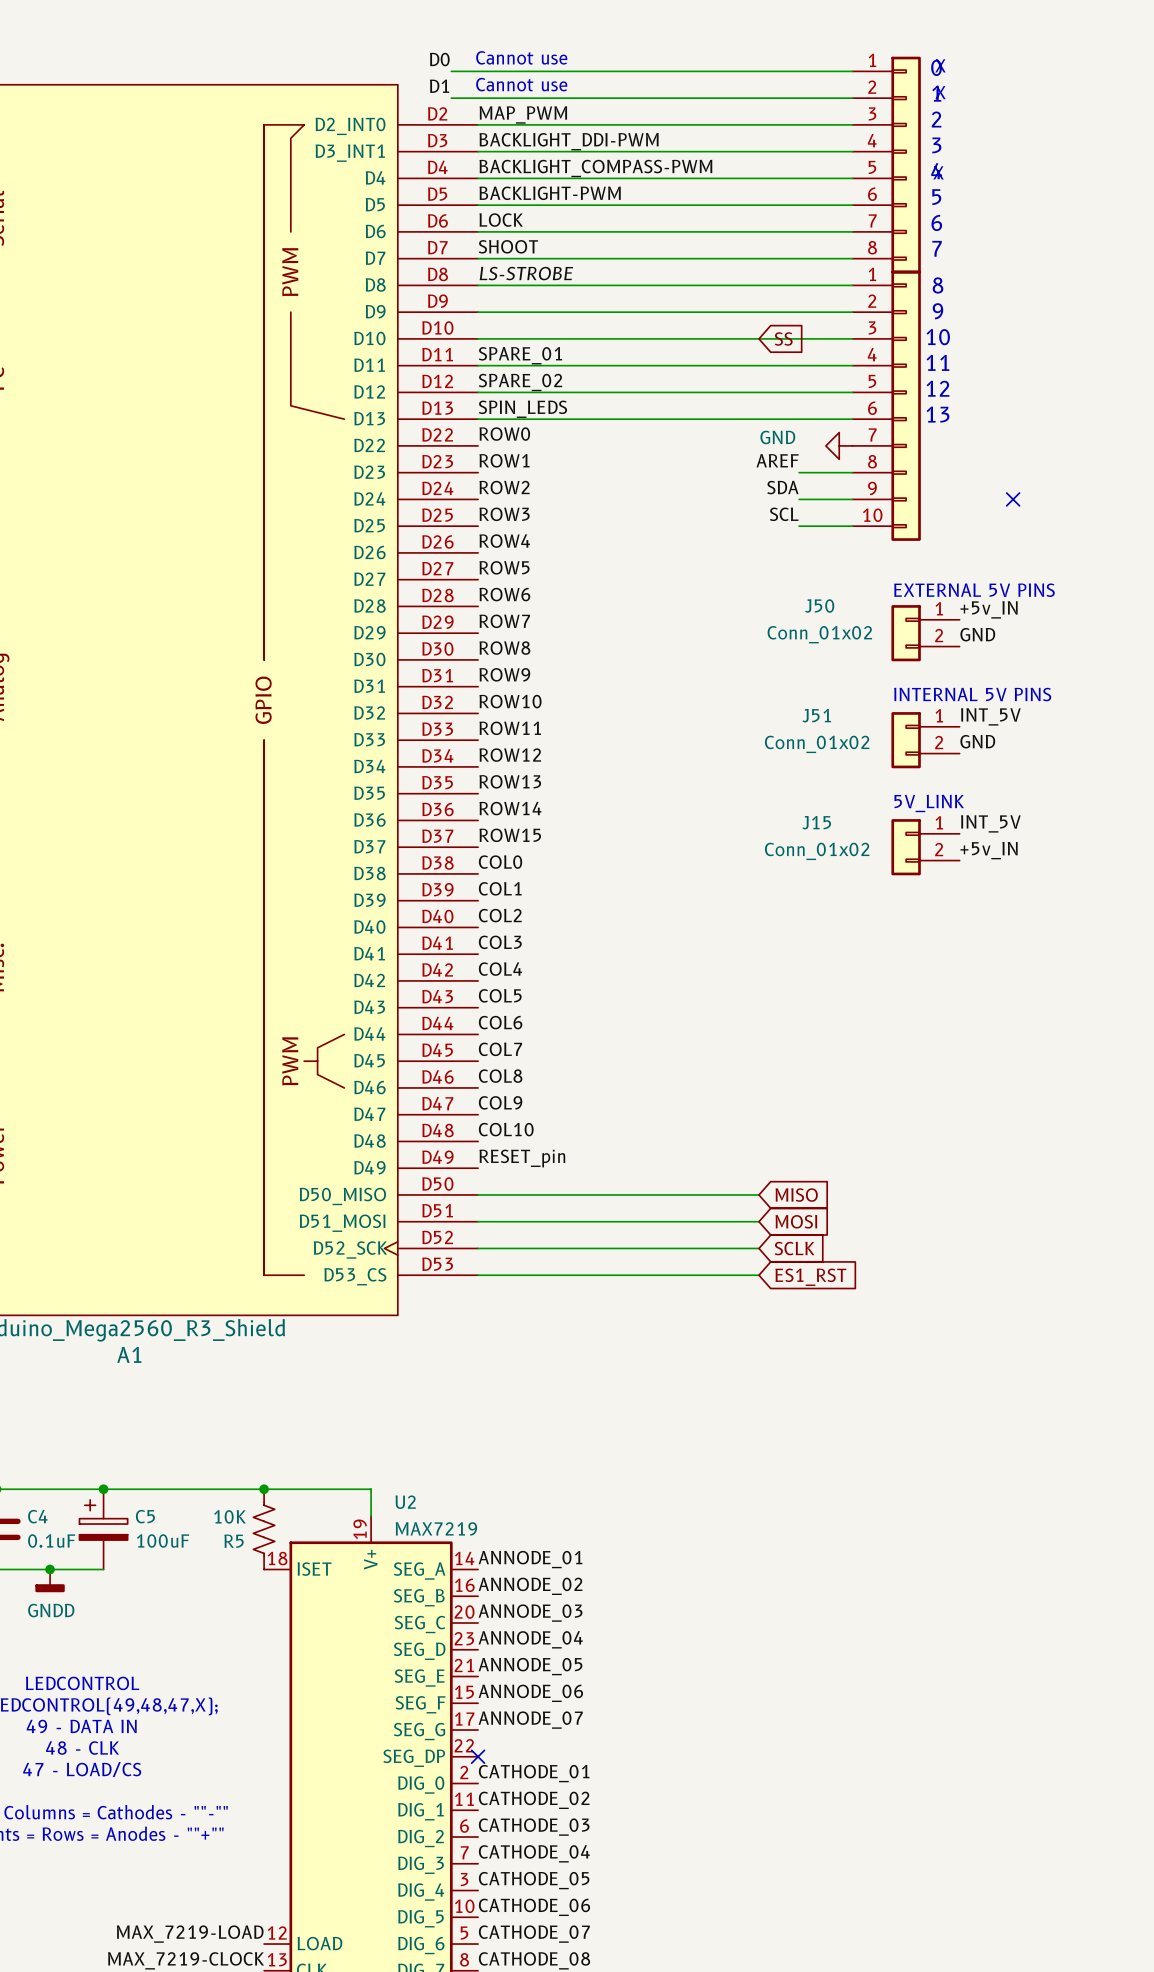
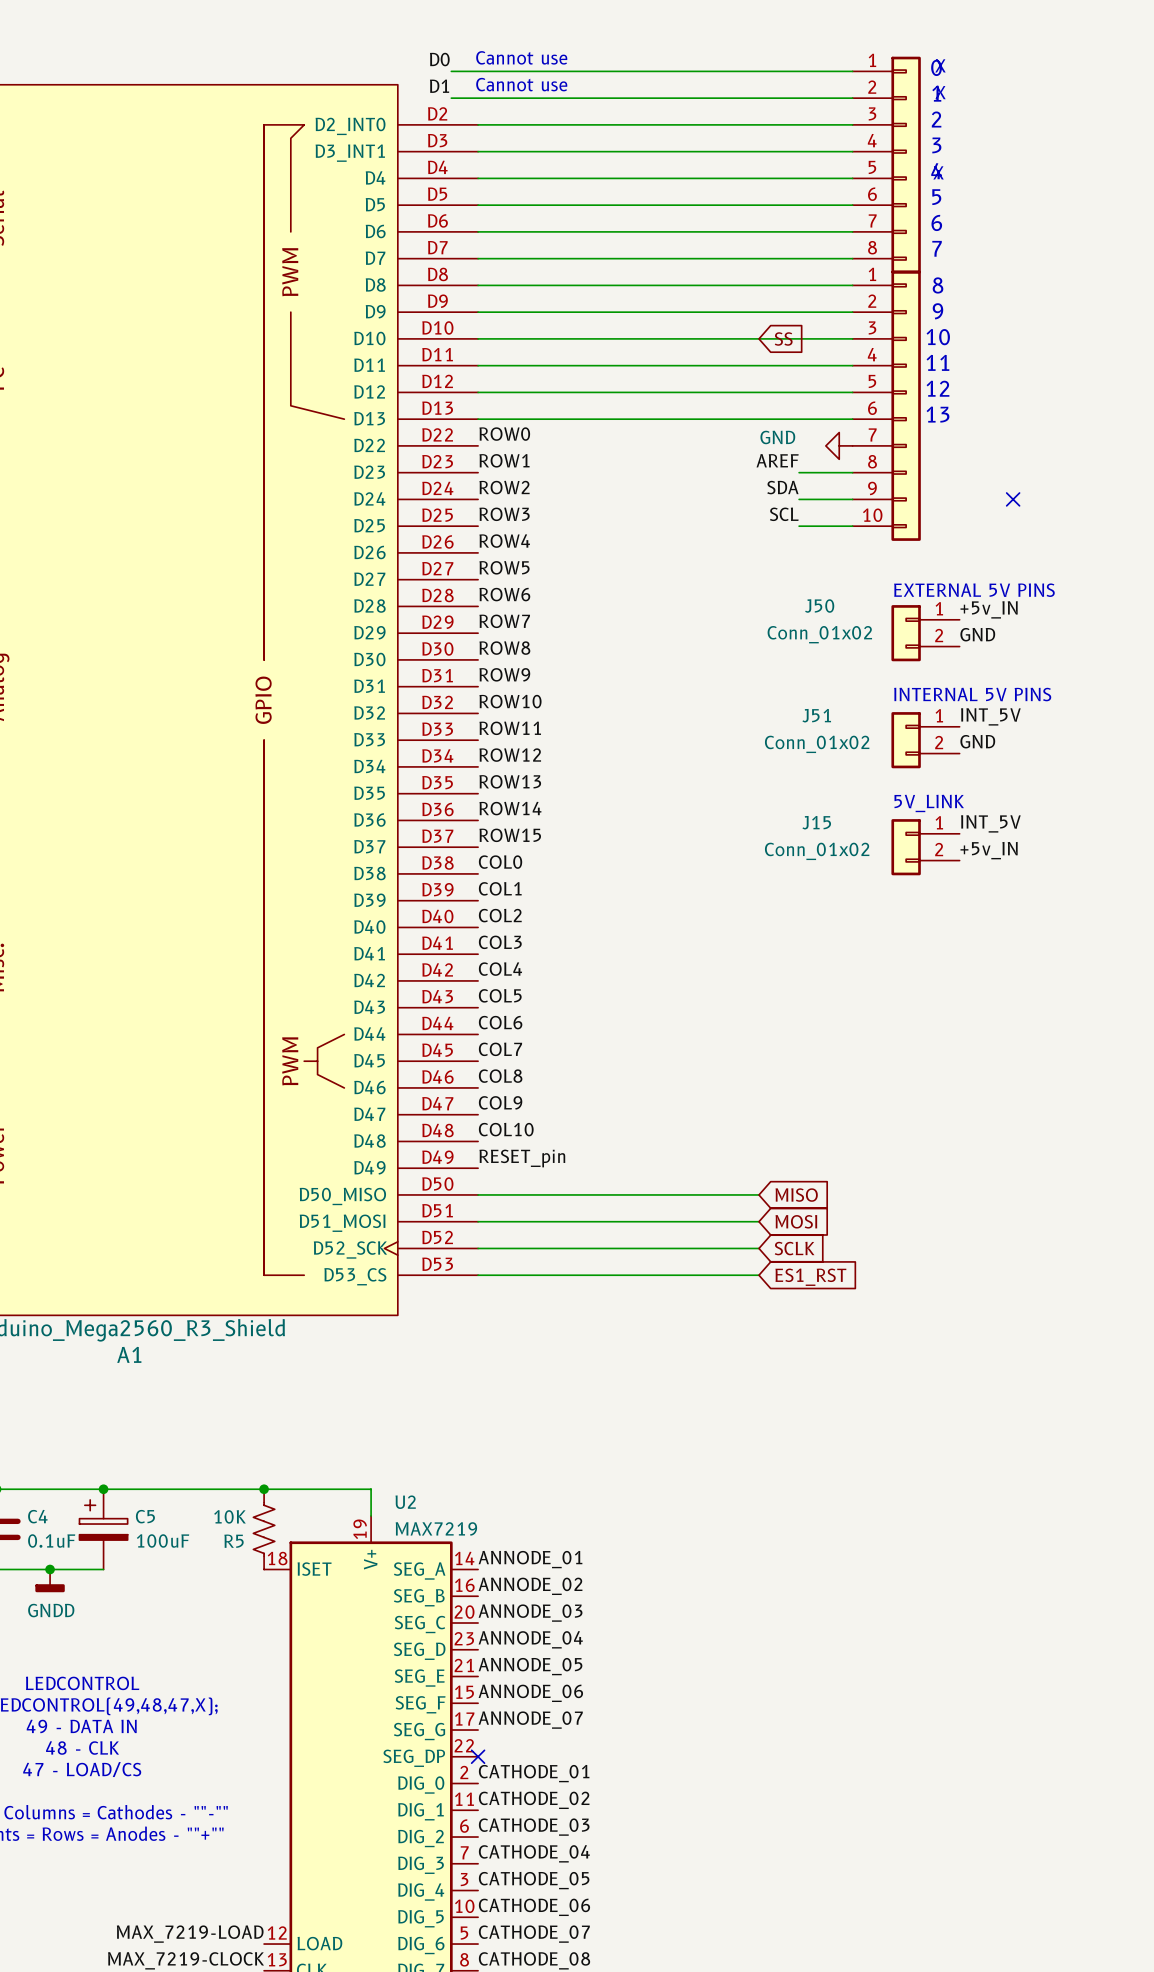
label: MAP_PWM (523, 114) -> none
label: BACKLIGHT_DDI-PWM (569, 141) -> none
label: BACKLIGHT_COMPASS-PWM (595, 168) -> none
label: BACKLIGHT-PWM (550, 193) -> none
label: LOCK (501, 220) -> none
label: SHOOT (508, 246) -> none
label: LS-STROBE (526, 273) -> none
label: SPARE_01 (520, 355) -> none
label: SPARE_02 (520, 382) -> none
label: SPIN_LEDS (522, 409) -> none

